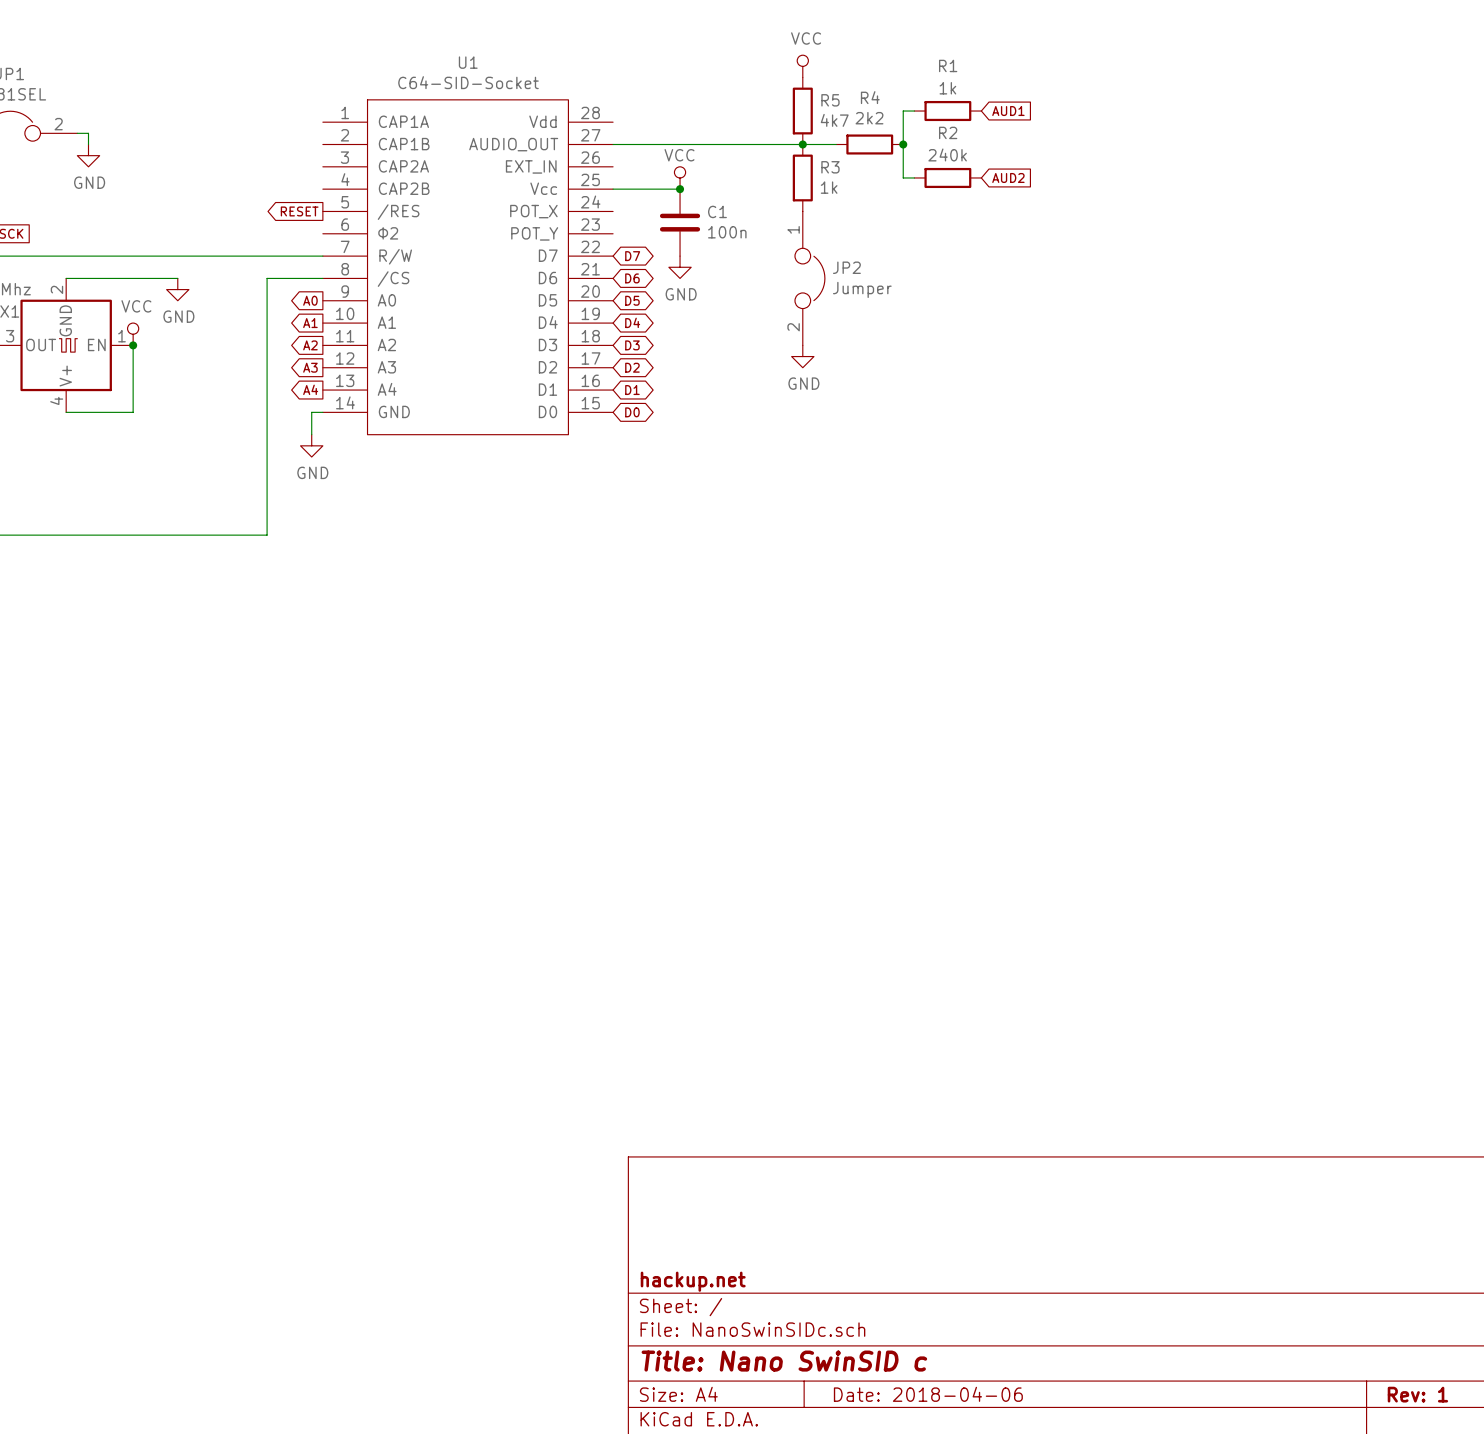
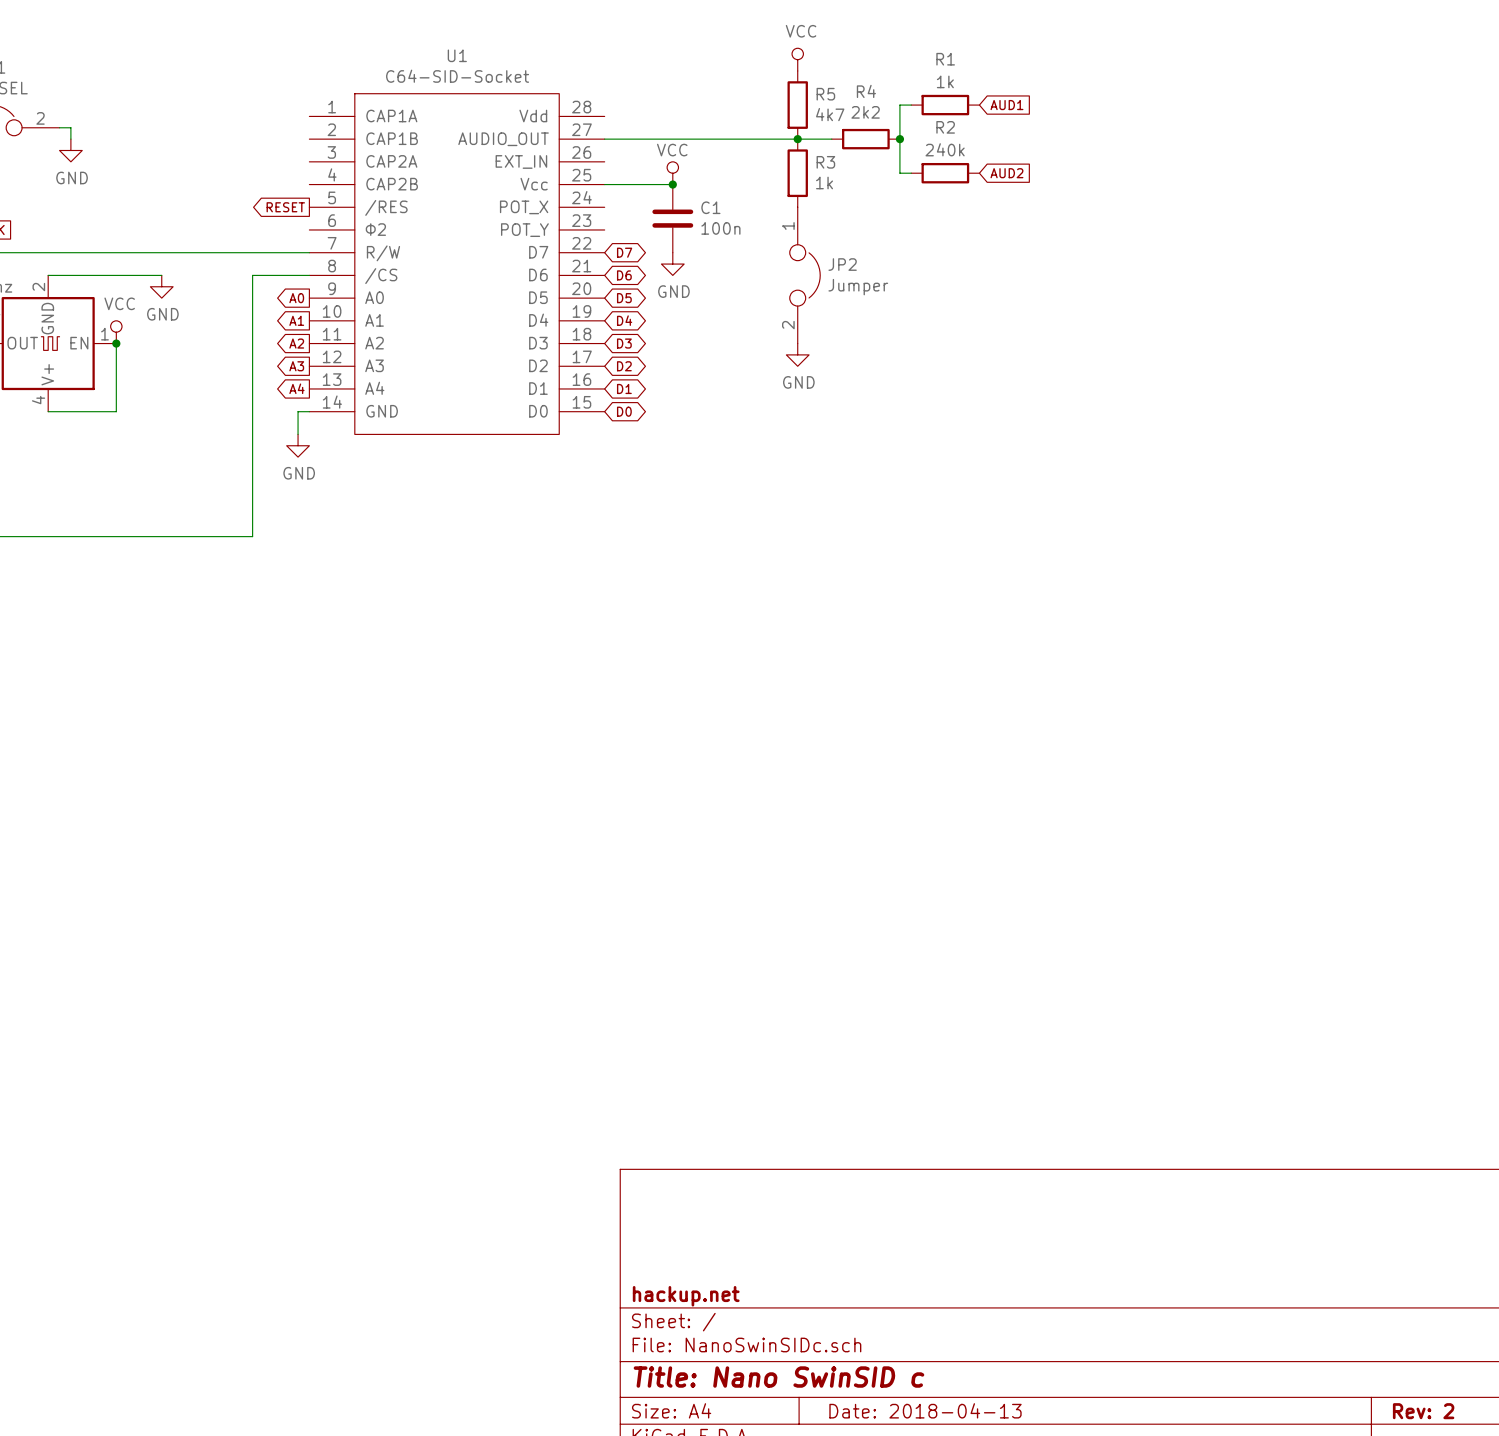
title block: Date: 2018-04-06 (928, 1394) -> Date: 2018-04-13 (925, 1410)
title block: Rev: 1 (1417, 1394) -> Rev: 2 (1423, 1411)

